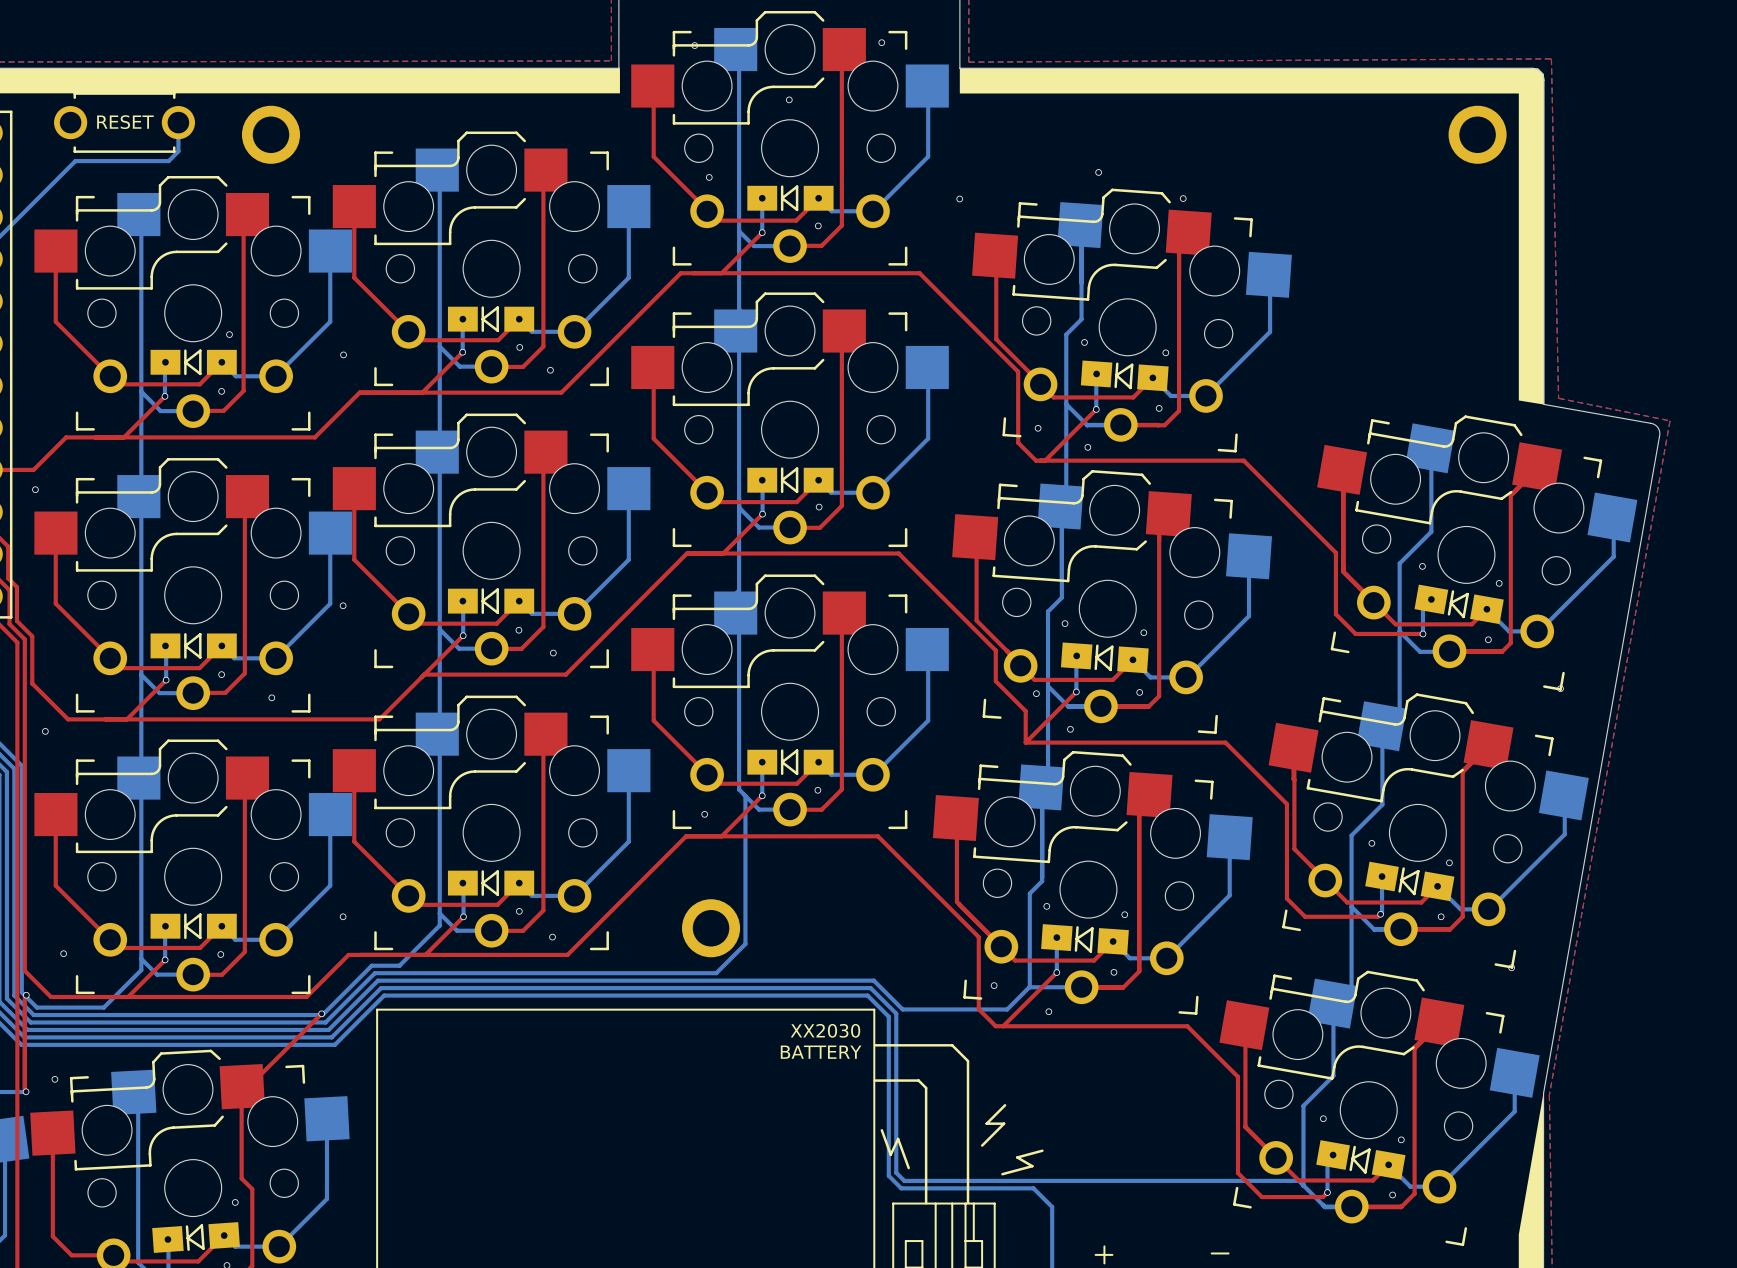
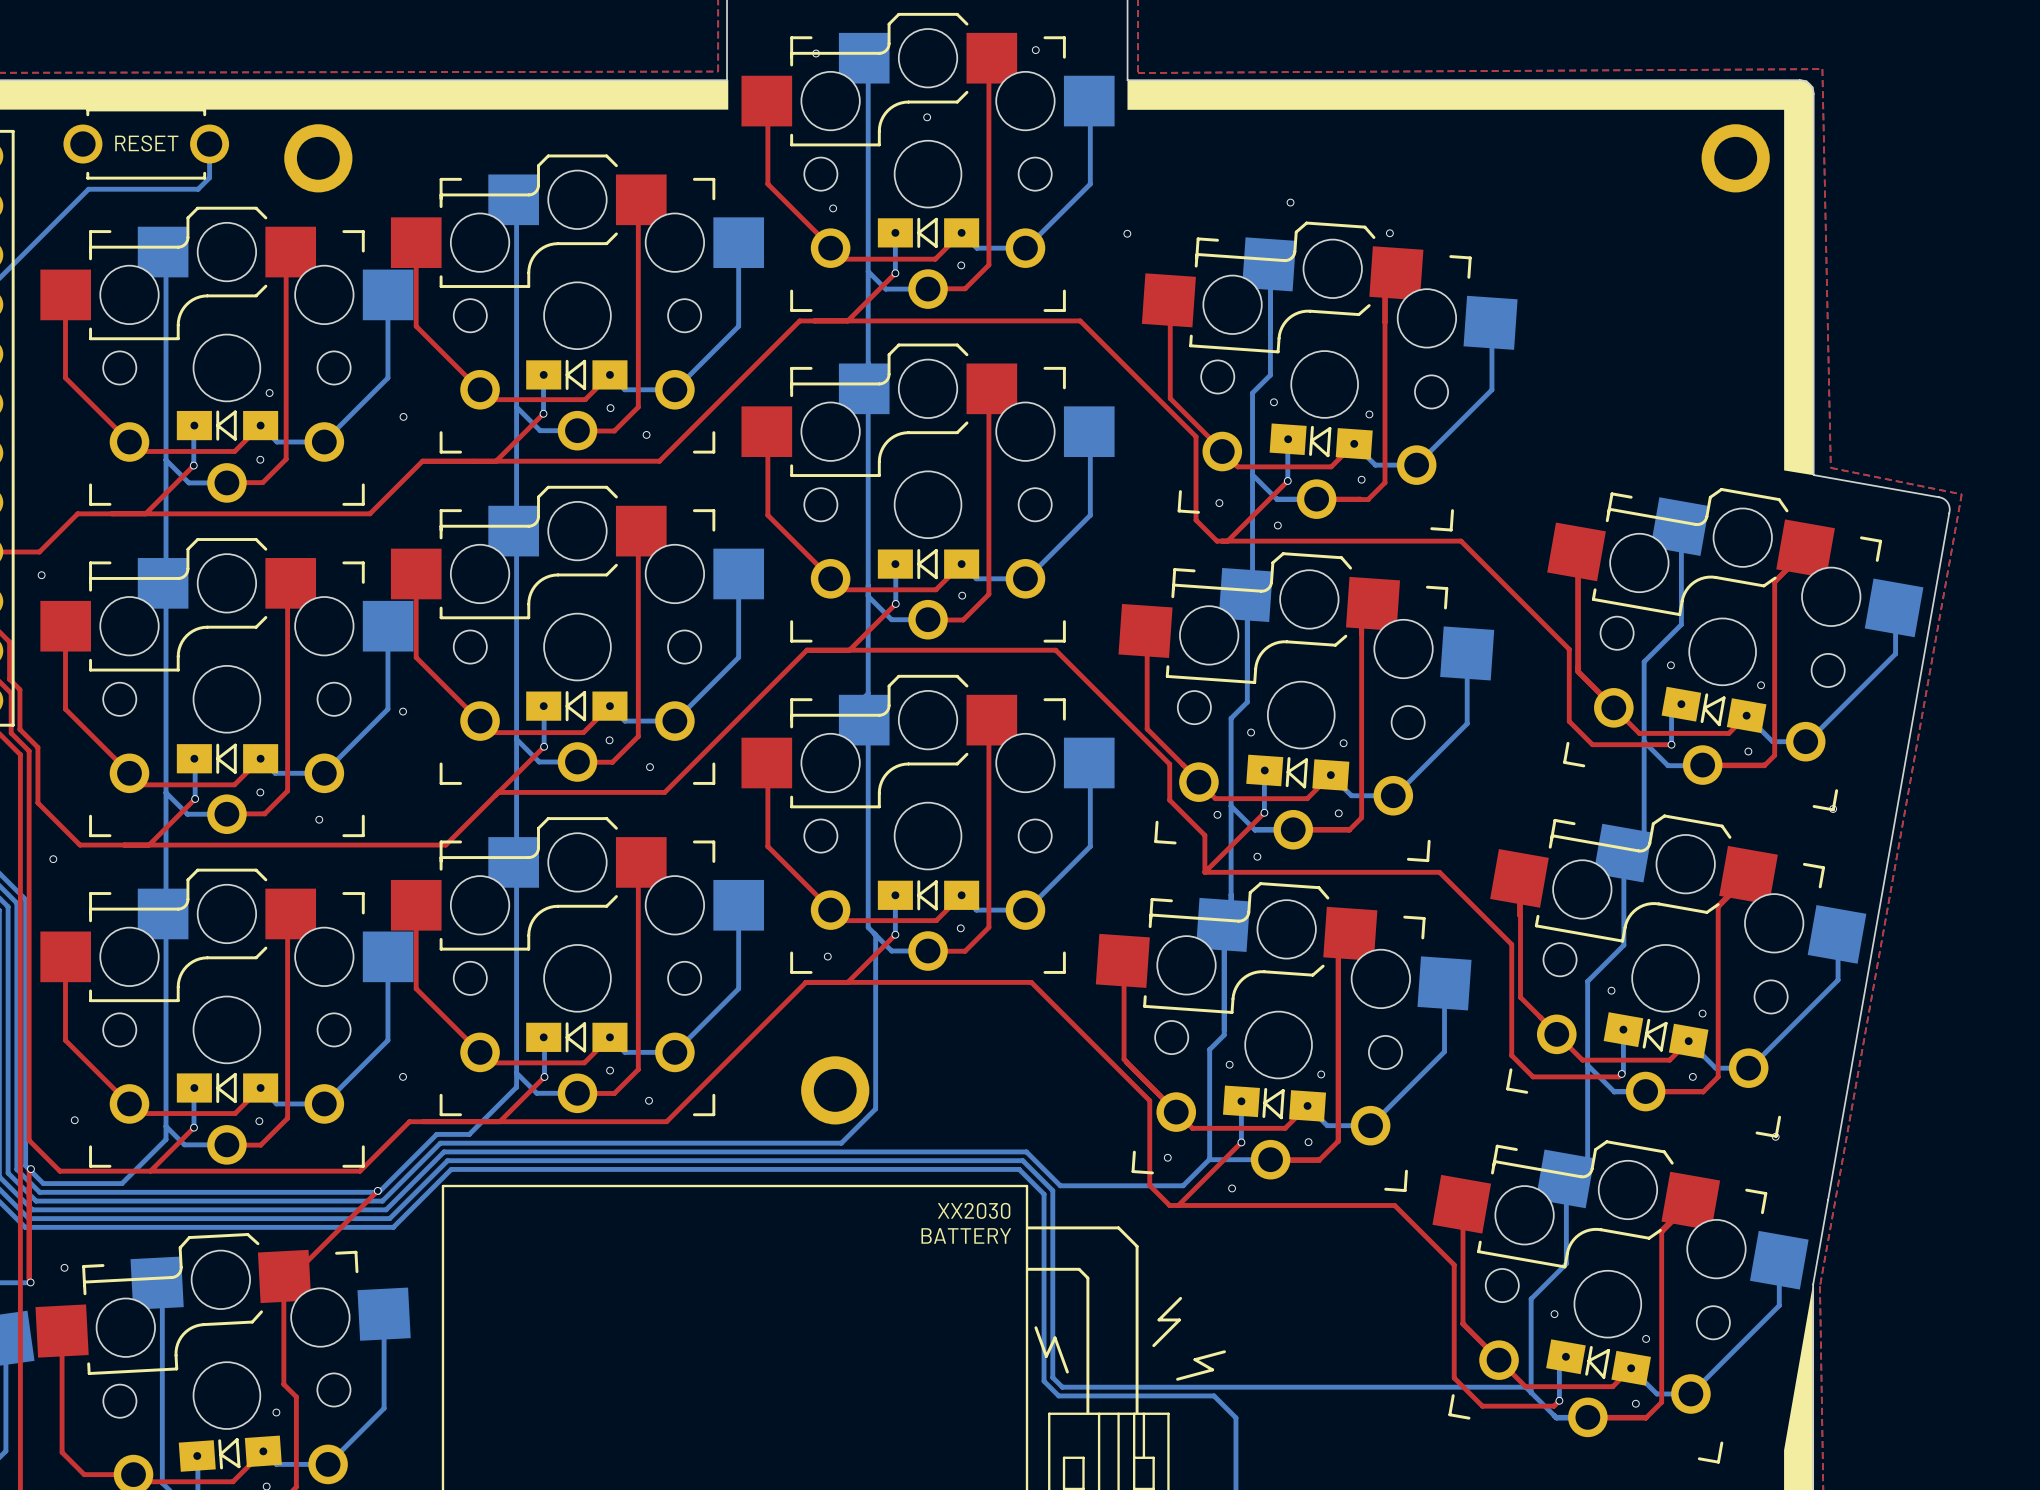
line: (1104, 1246) (1104, 1263) -> none
line: (1211, 1253) (1228, 1253) -> none
line: (1095, 1254) (1112, 1254) -> none

